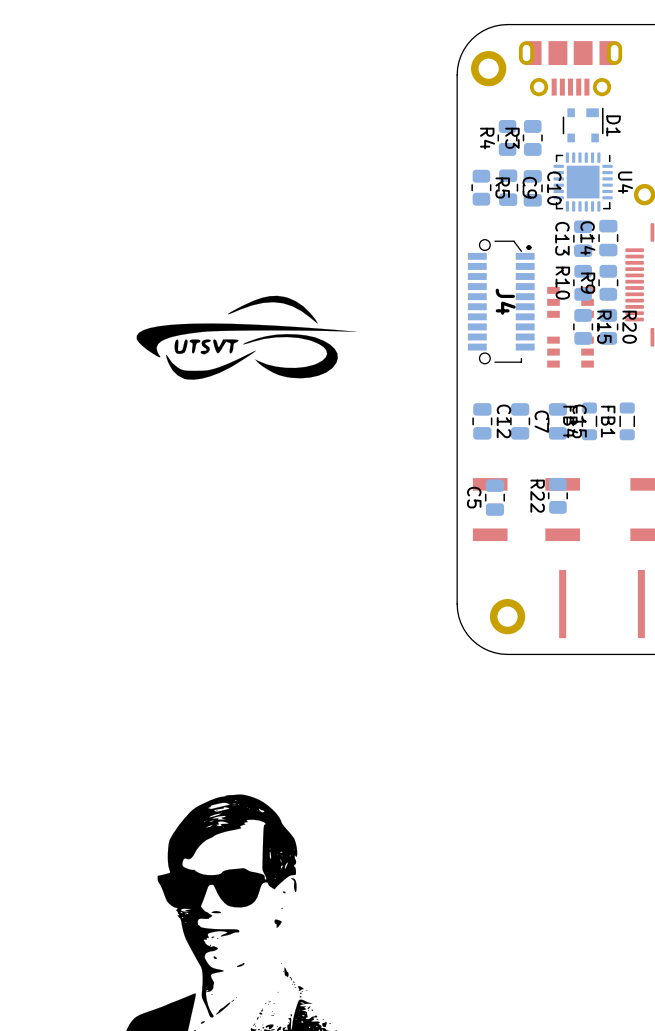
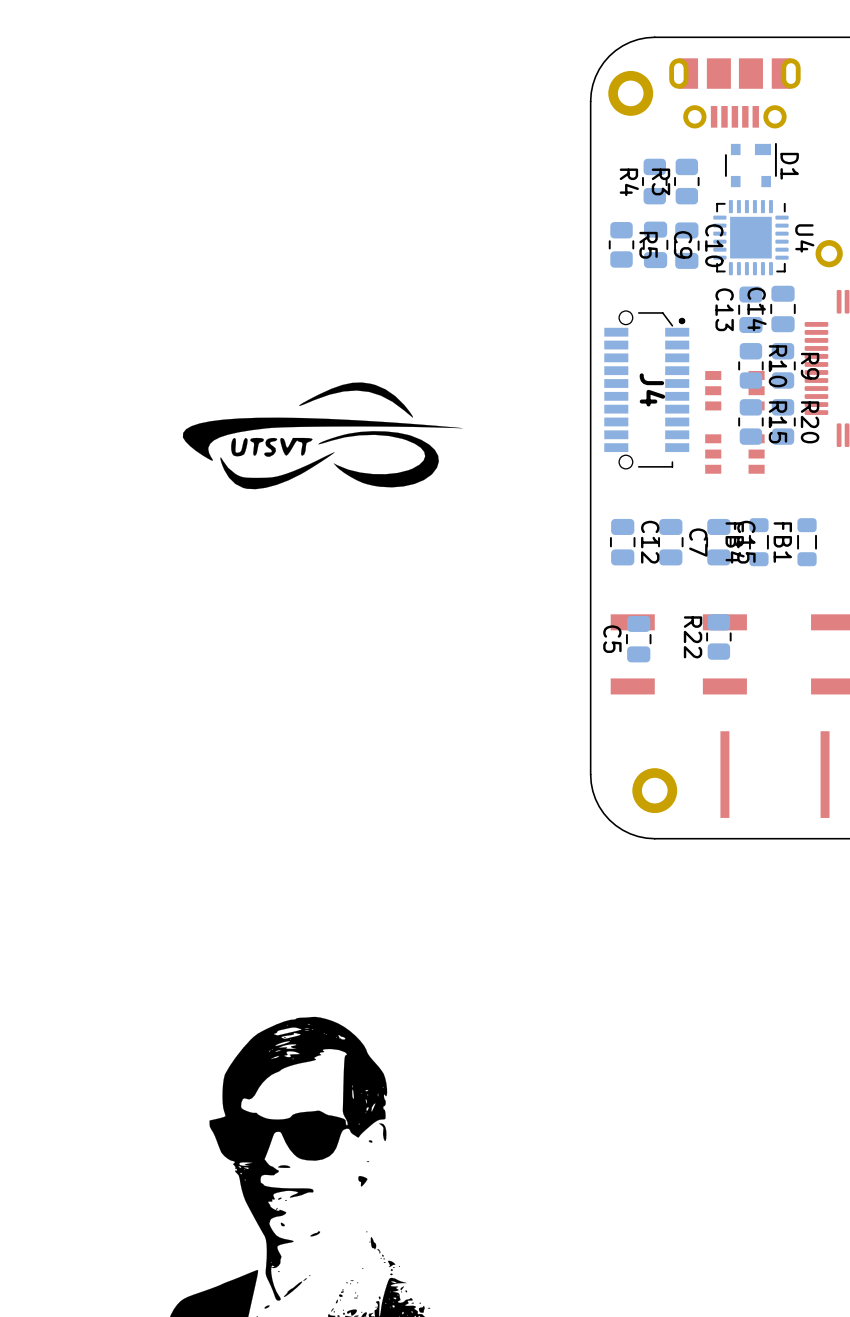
R10 name position: R10 (562, 283) -> R10 (777, 366)
R9 name position: R9 (588, 283) -> R9 (810, 366)

